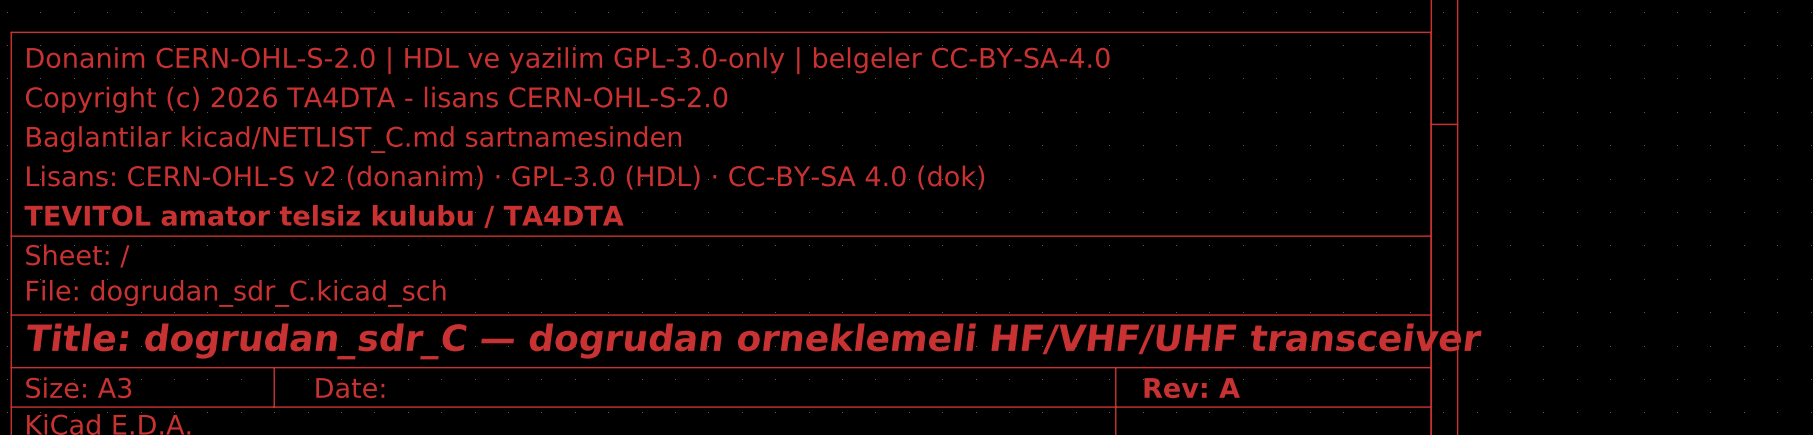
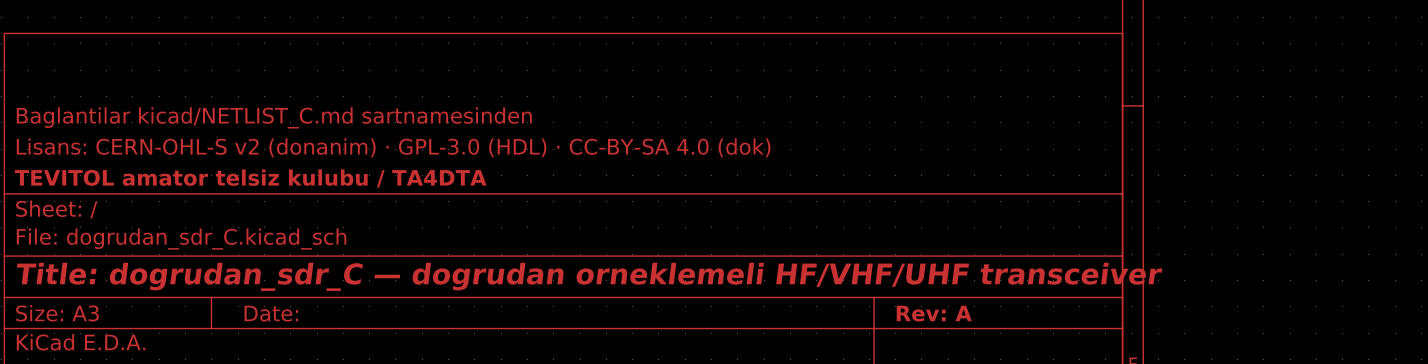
title block: Donanim CERN-OHL-S-2.0 | HDL ve yazilim GPL-3.0-only | belgeler CC-BY-SA-4.0 (568, 60) -> none
title block: Copyright (c) 2026 TA4DTA - lisans CERN-OHL-S-2.0 (376, 99) -> none

